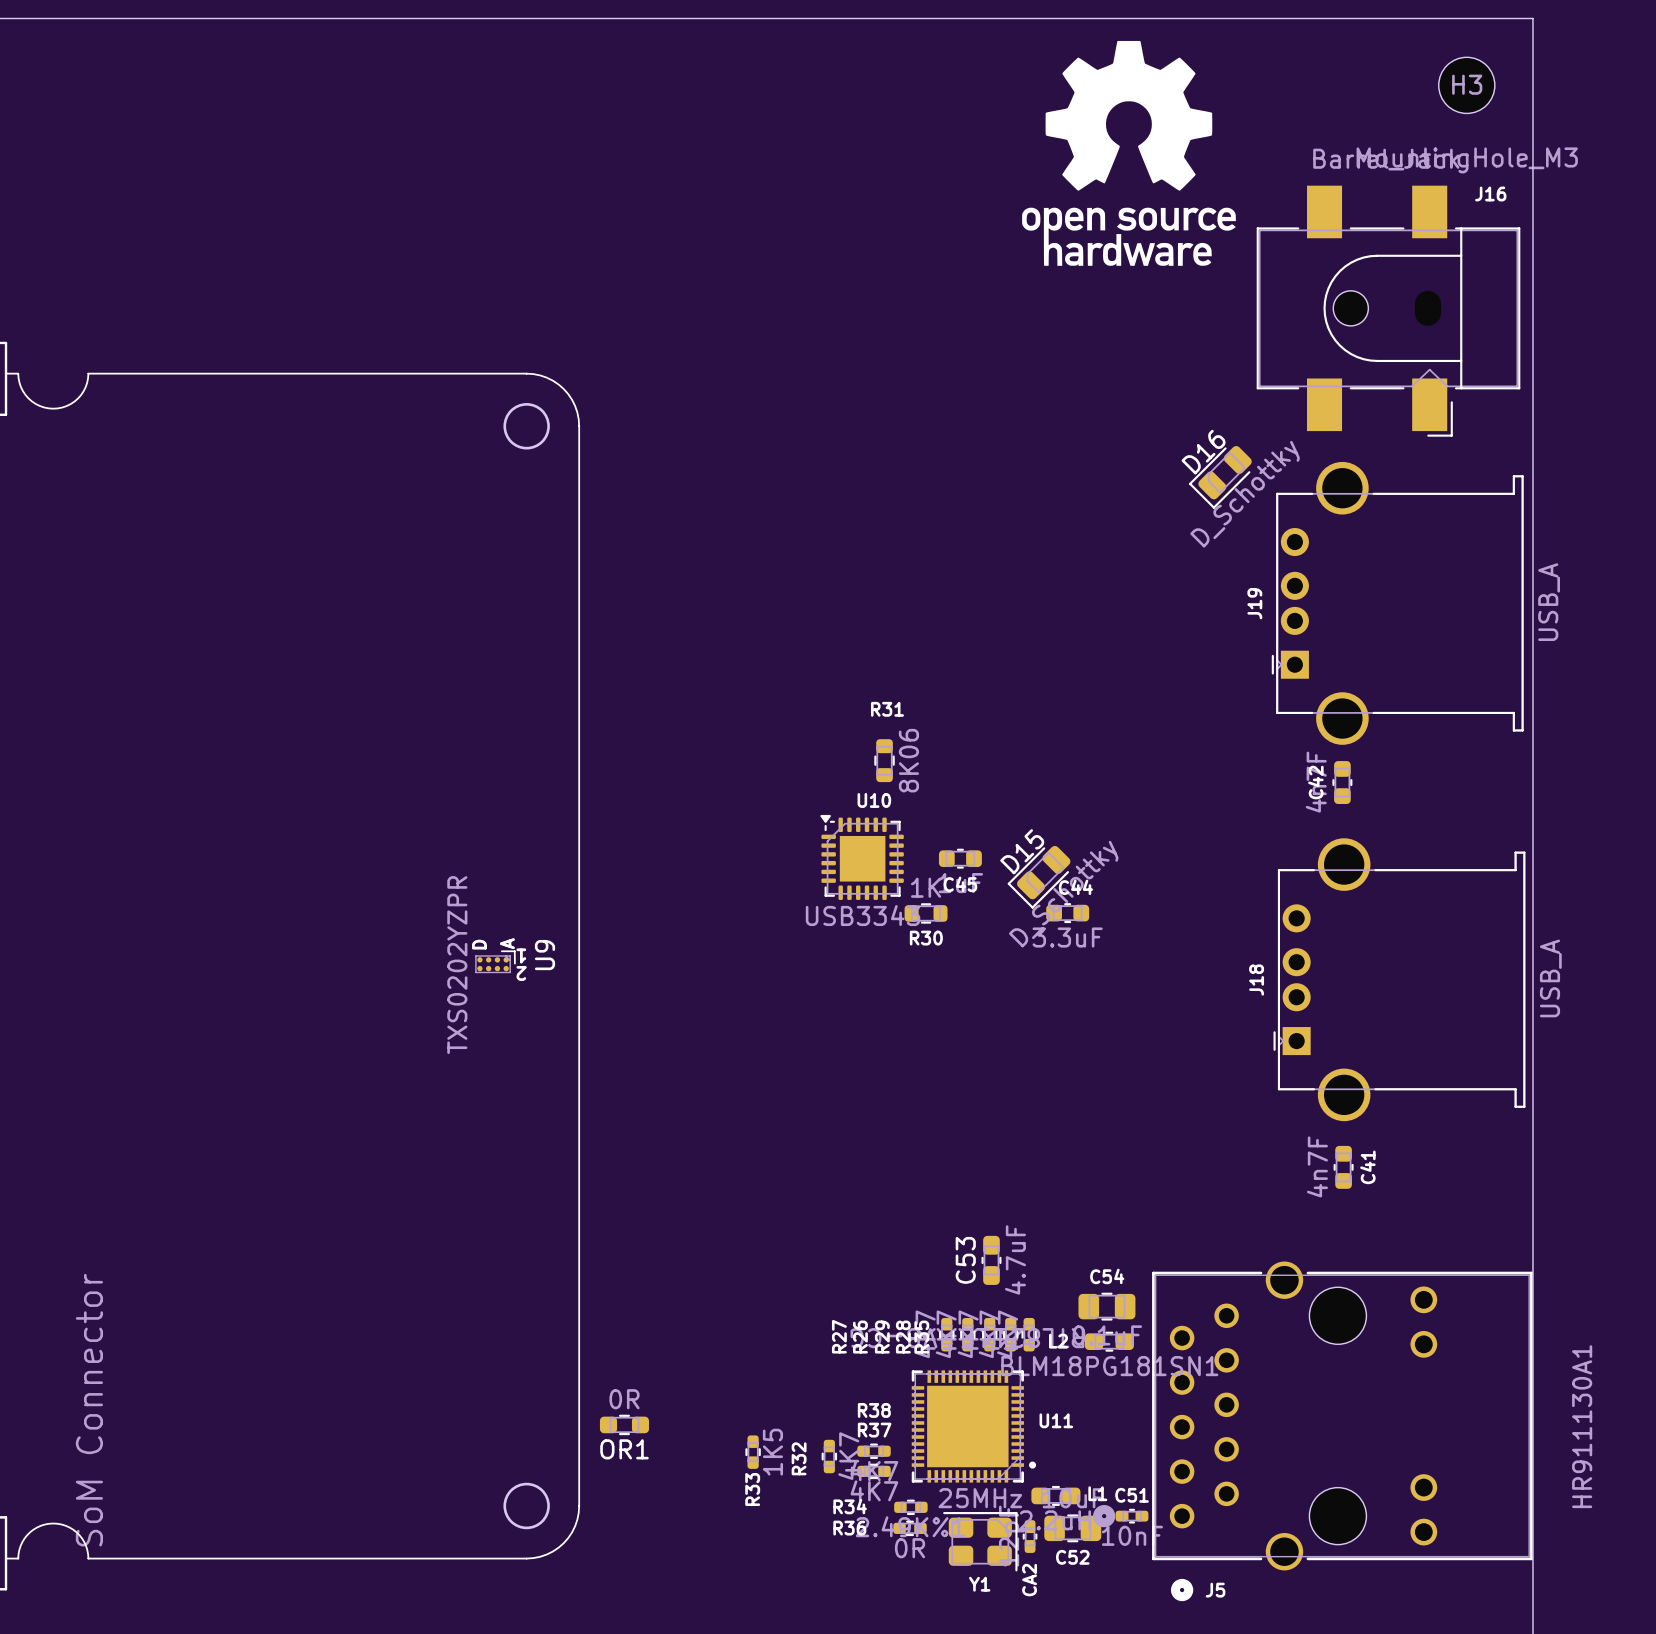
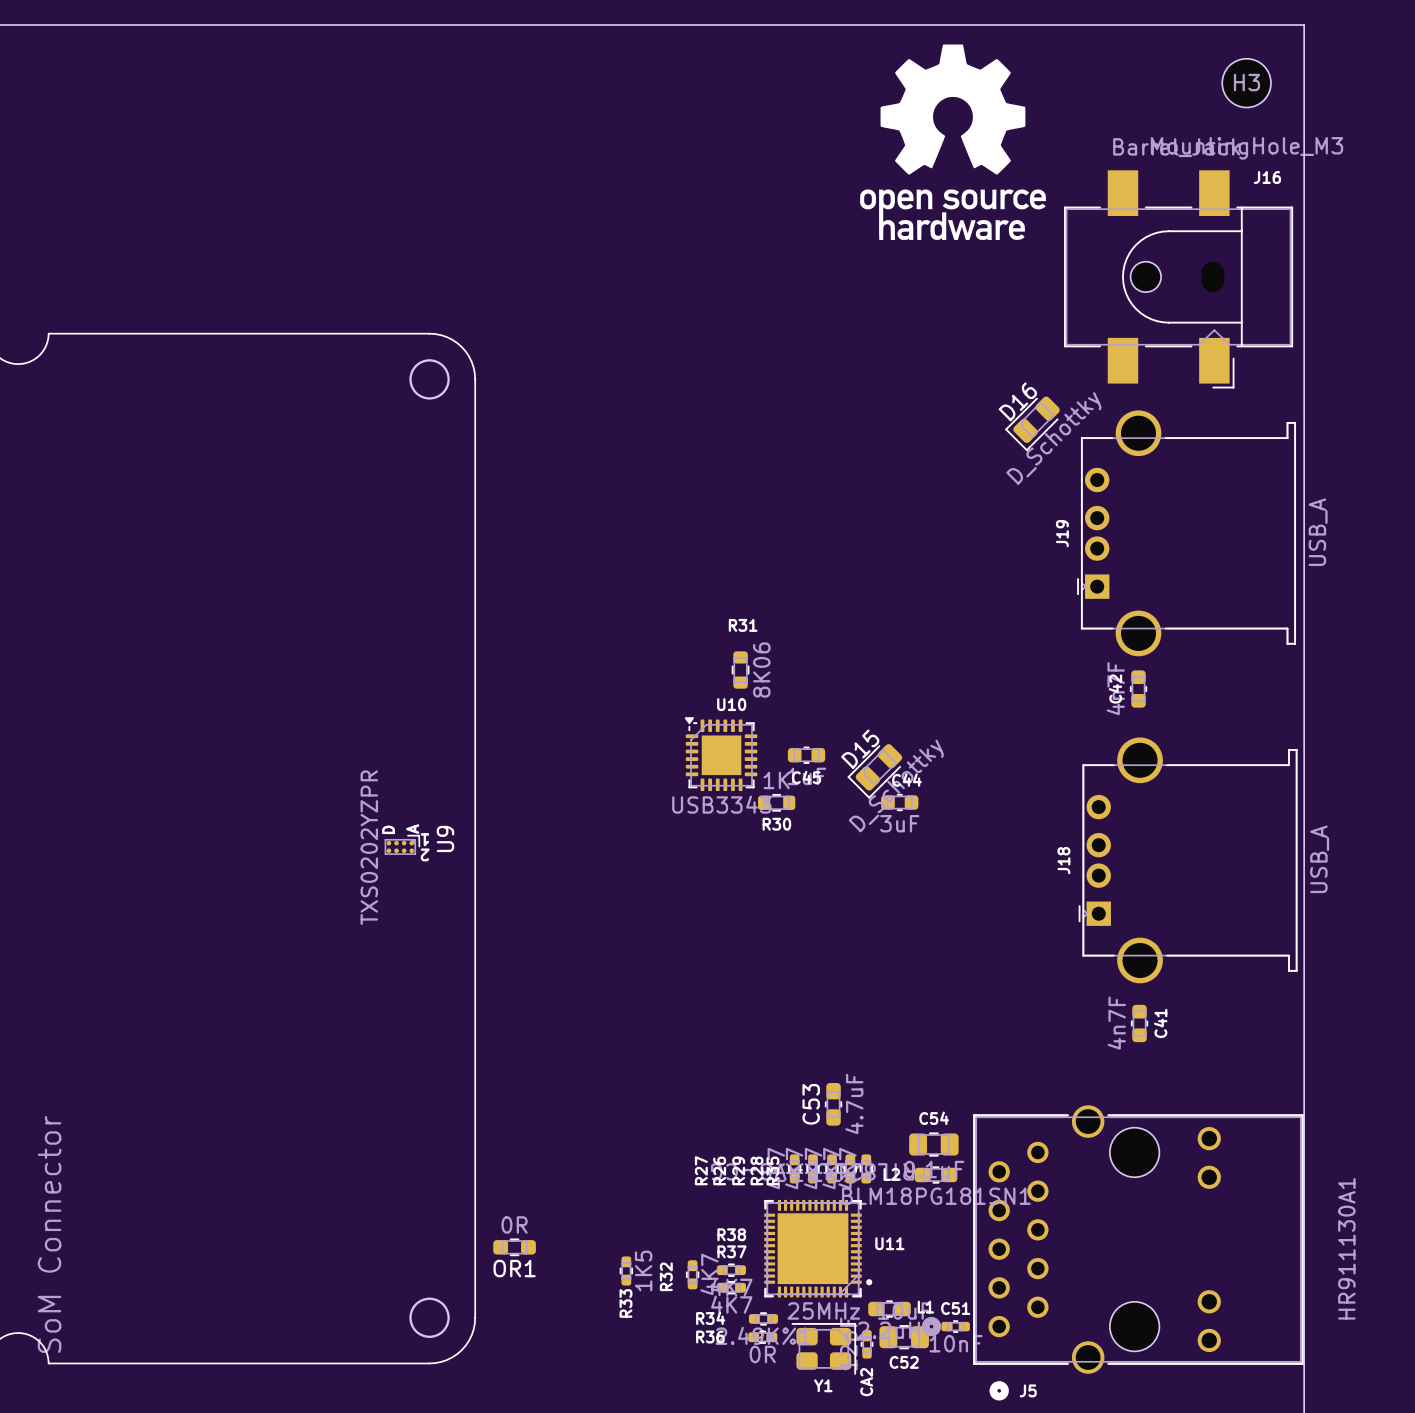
C44 value: 3.3uF (1067, 937) -> 3uF (899, 823)

